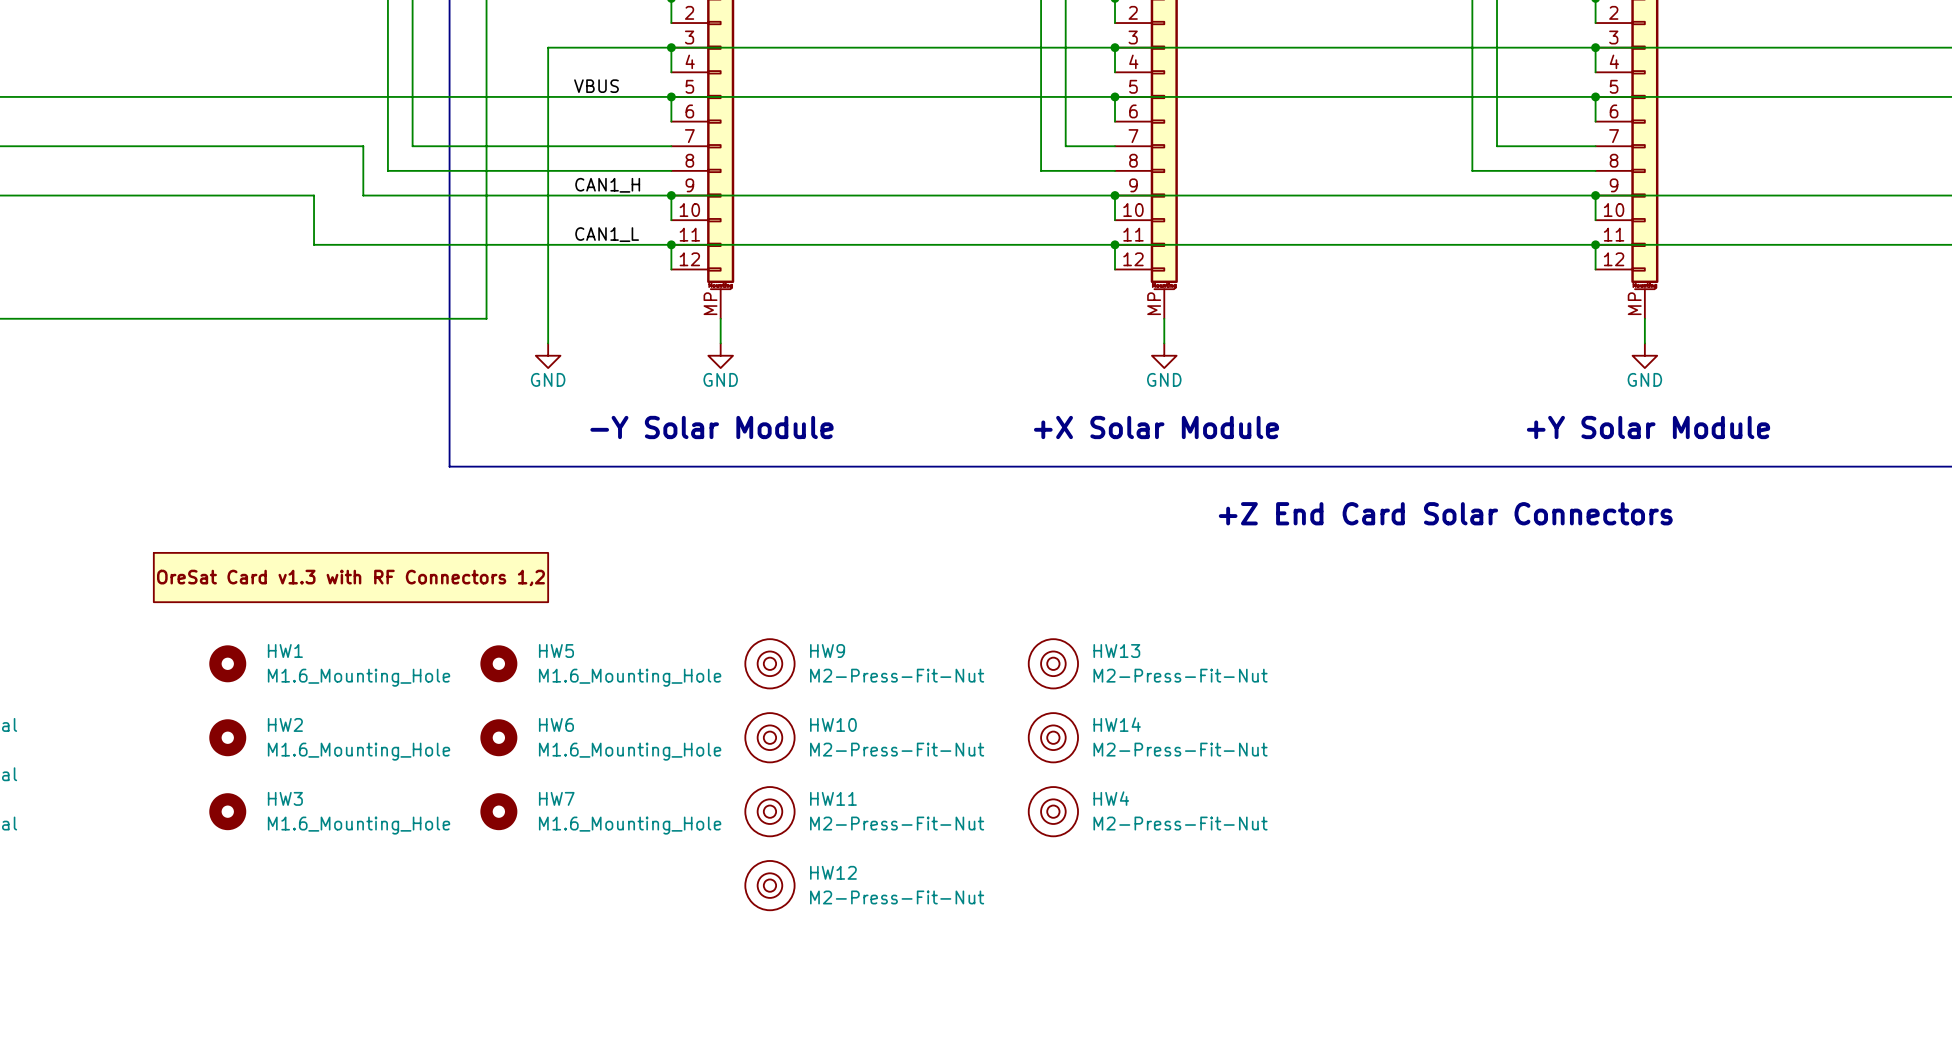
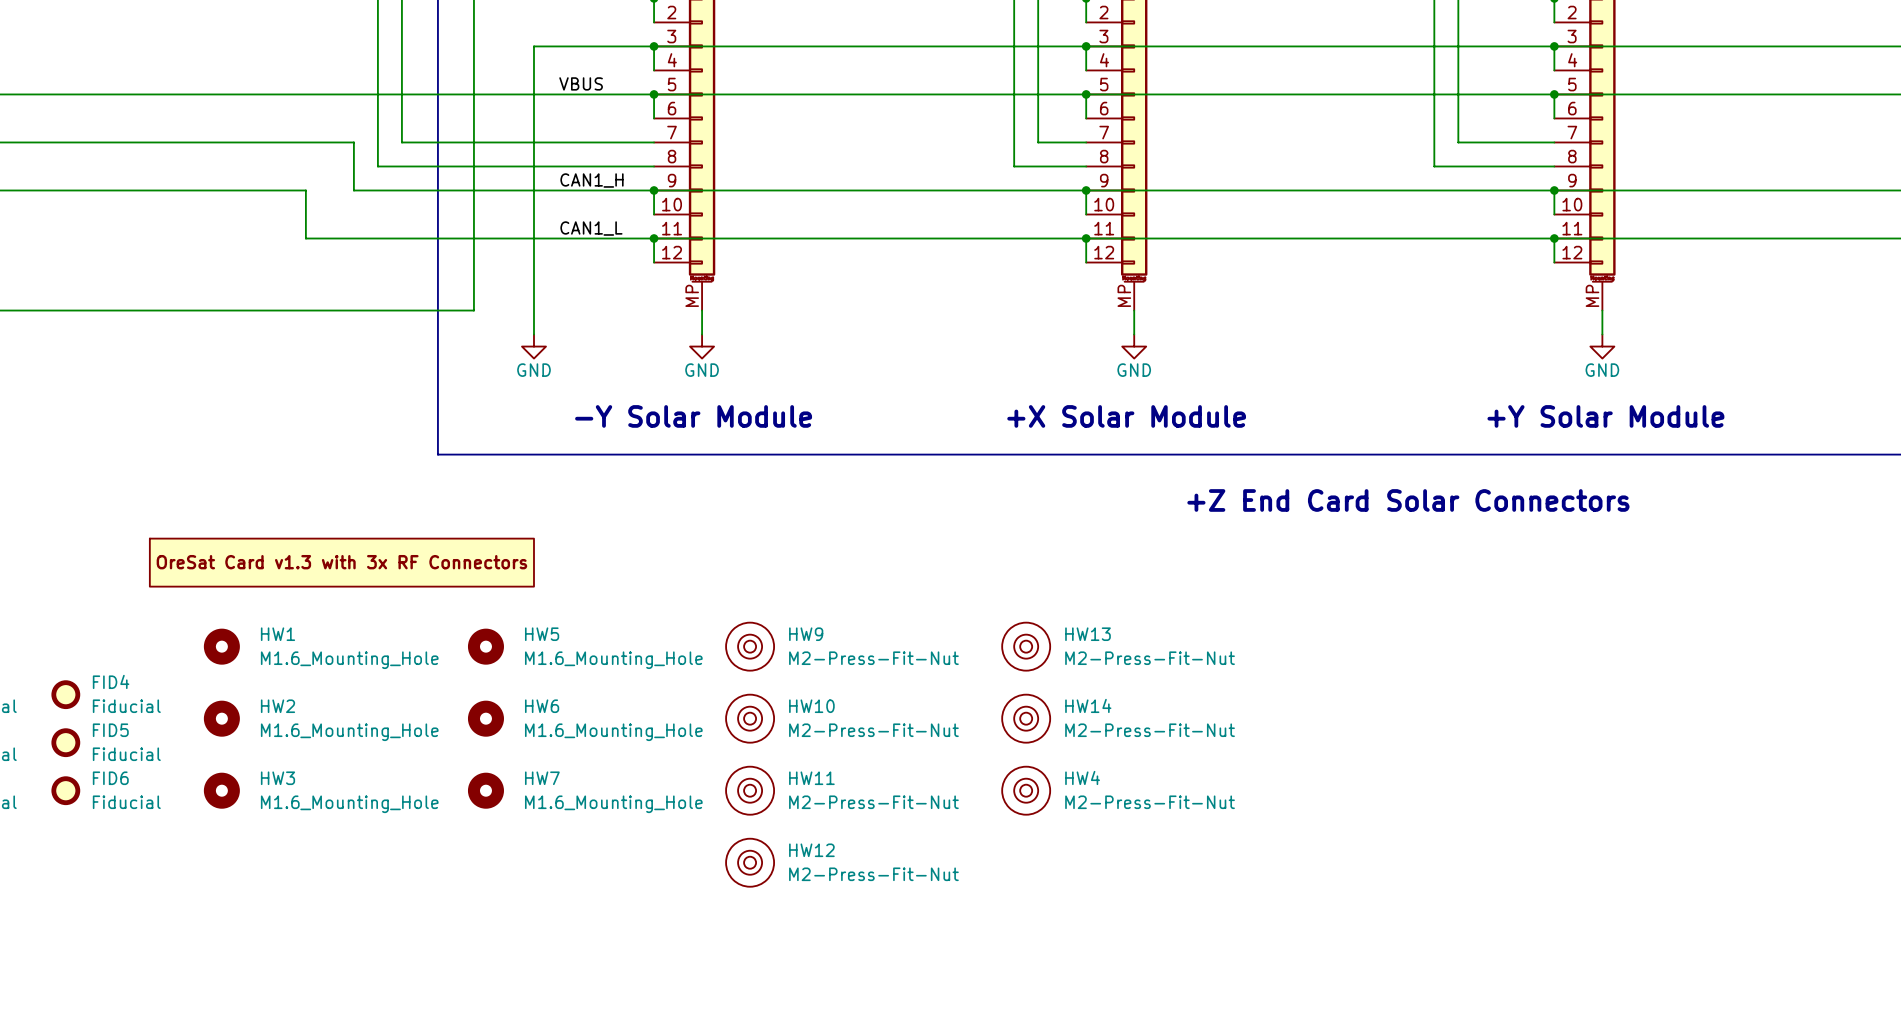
part text: OreSat Card v1.3 with RF Connectors 1,2 (350, 577) -> OreSat Card v1.3 with 3x RF Connectors (341, 562)
FID4: none -> Fiducial (65, 694)
FID5: none -> Fiducial (65, 742)
FID6: none -> Fiducial (65, 790)

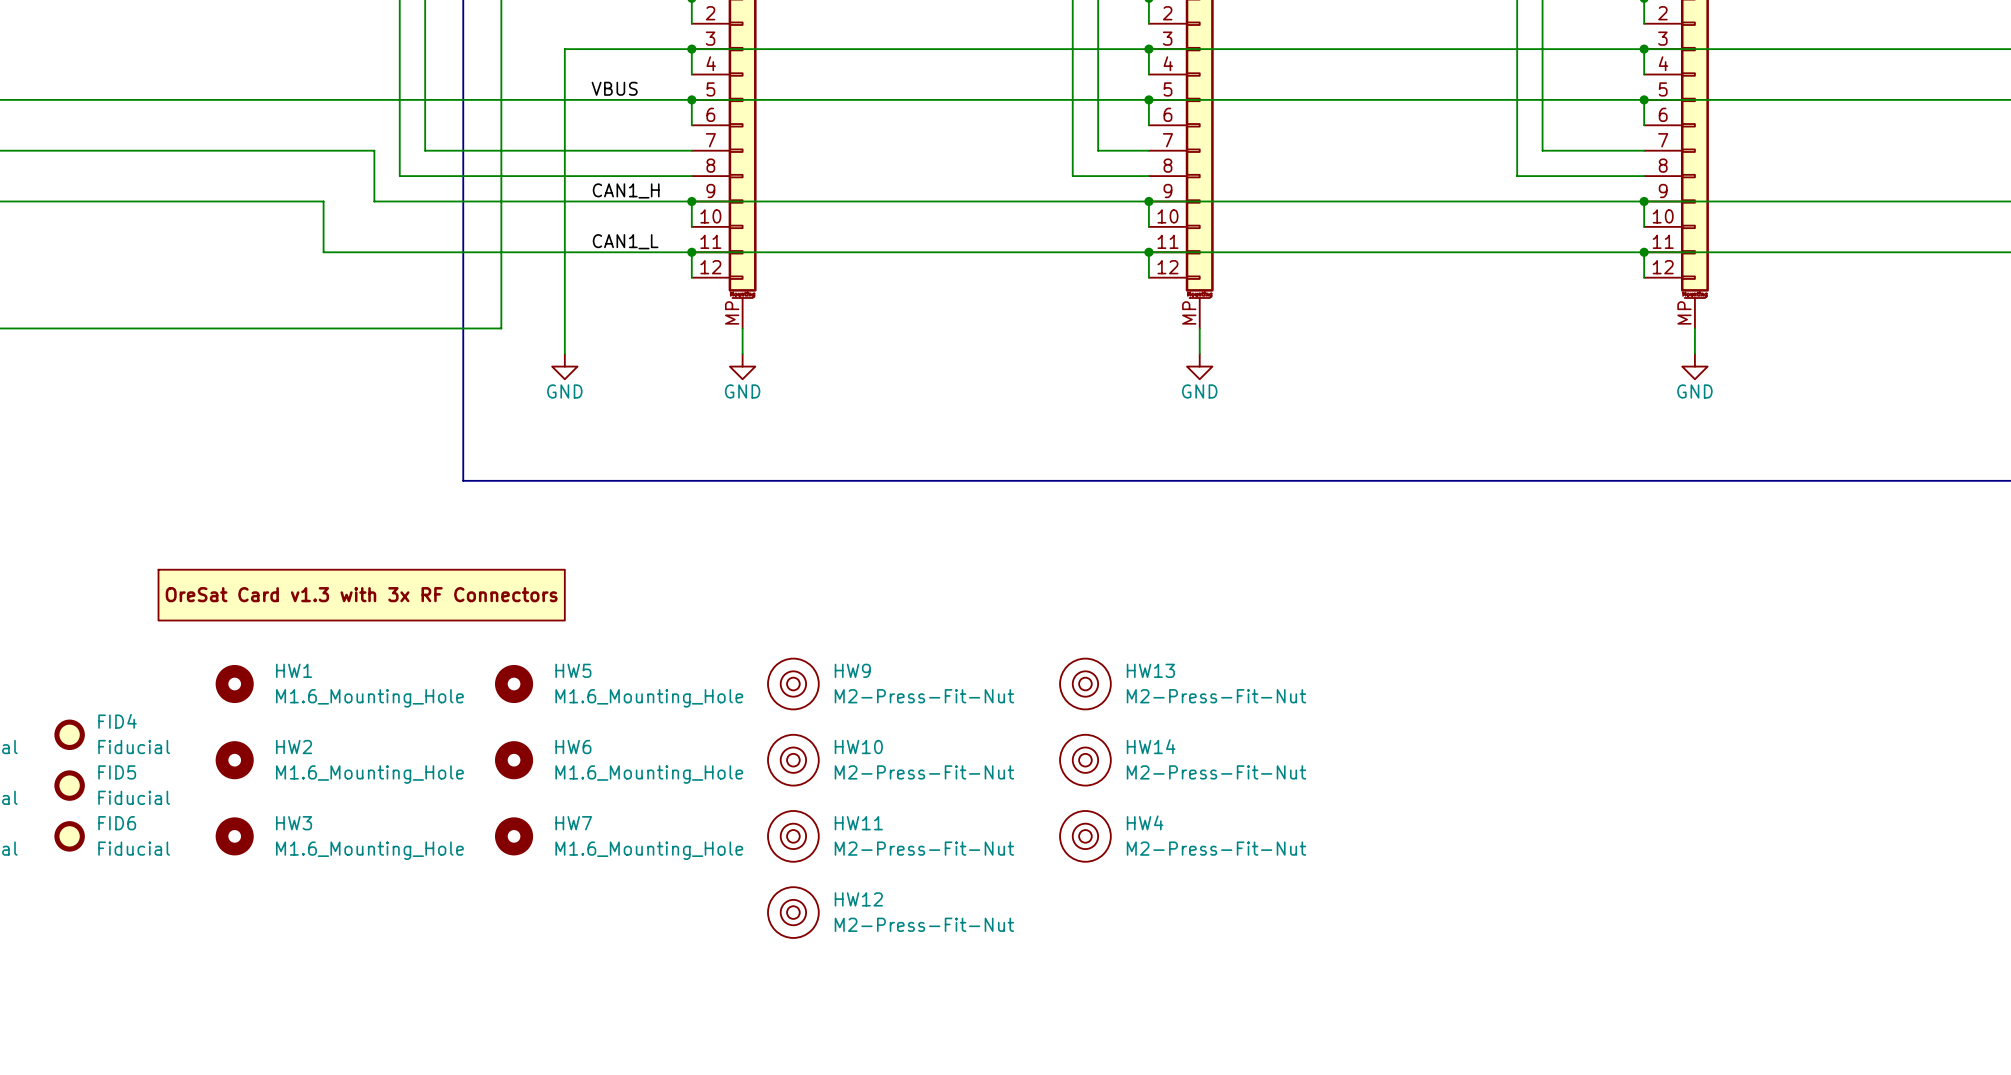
text: -Y Solar Module (693, 416) -> none
text: +X Solar Module (1126, 416) -> none
text: +Y Solar Module (1605, 416) -> none
text: +Z End Card Solar Connectors (1408, 500) -> none

